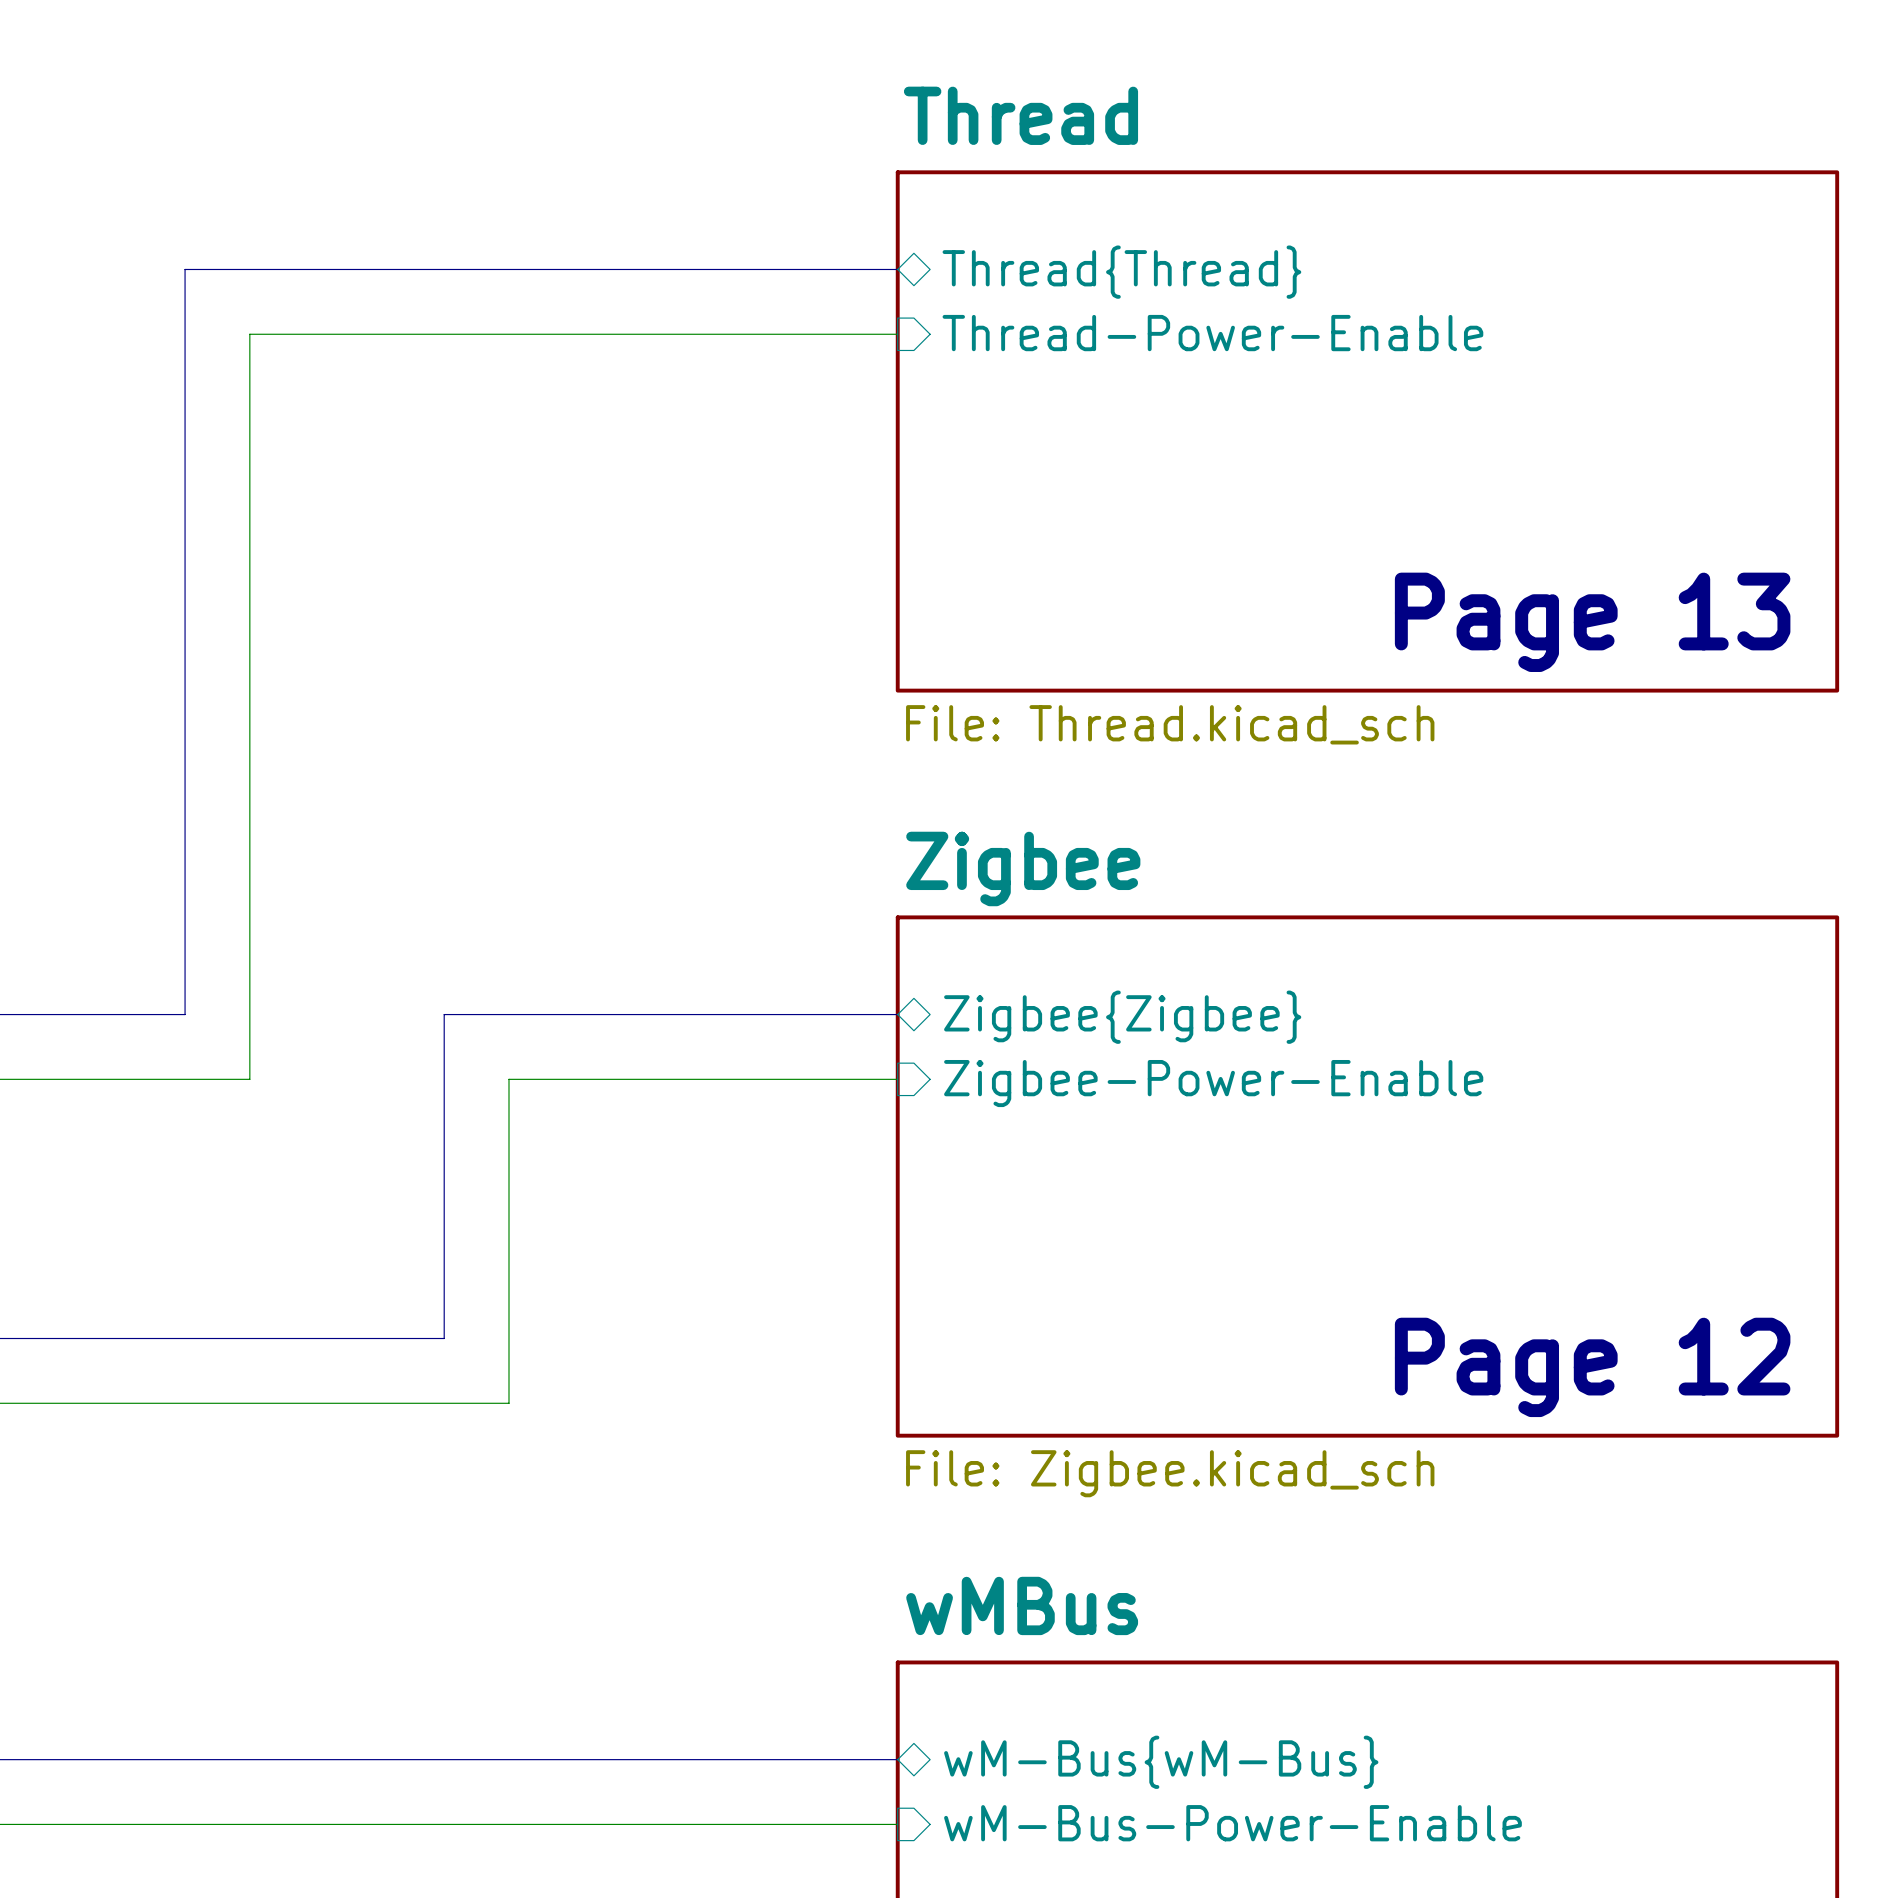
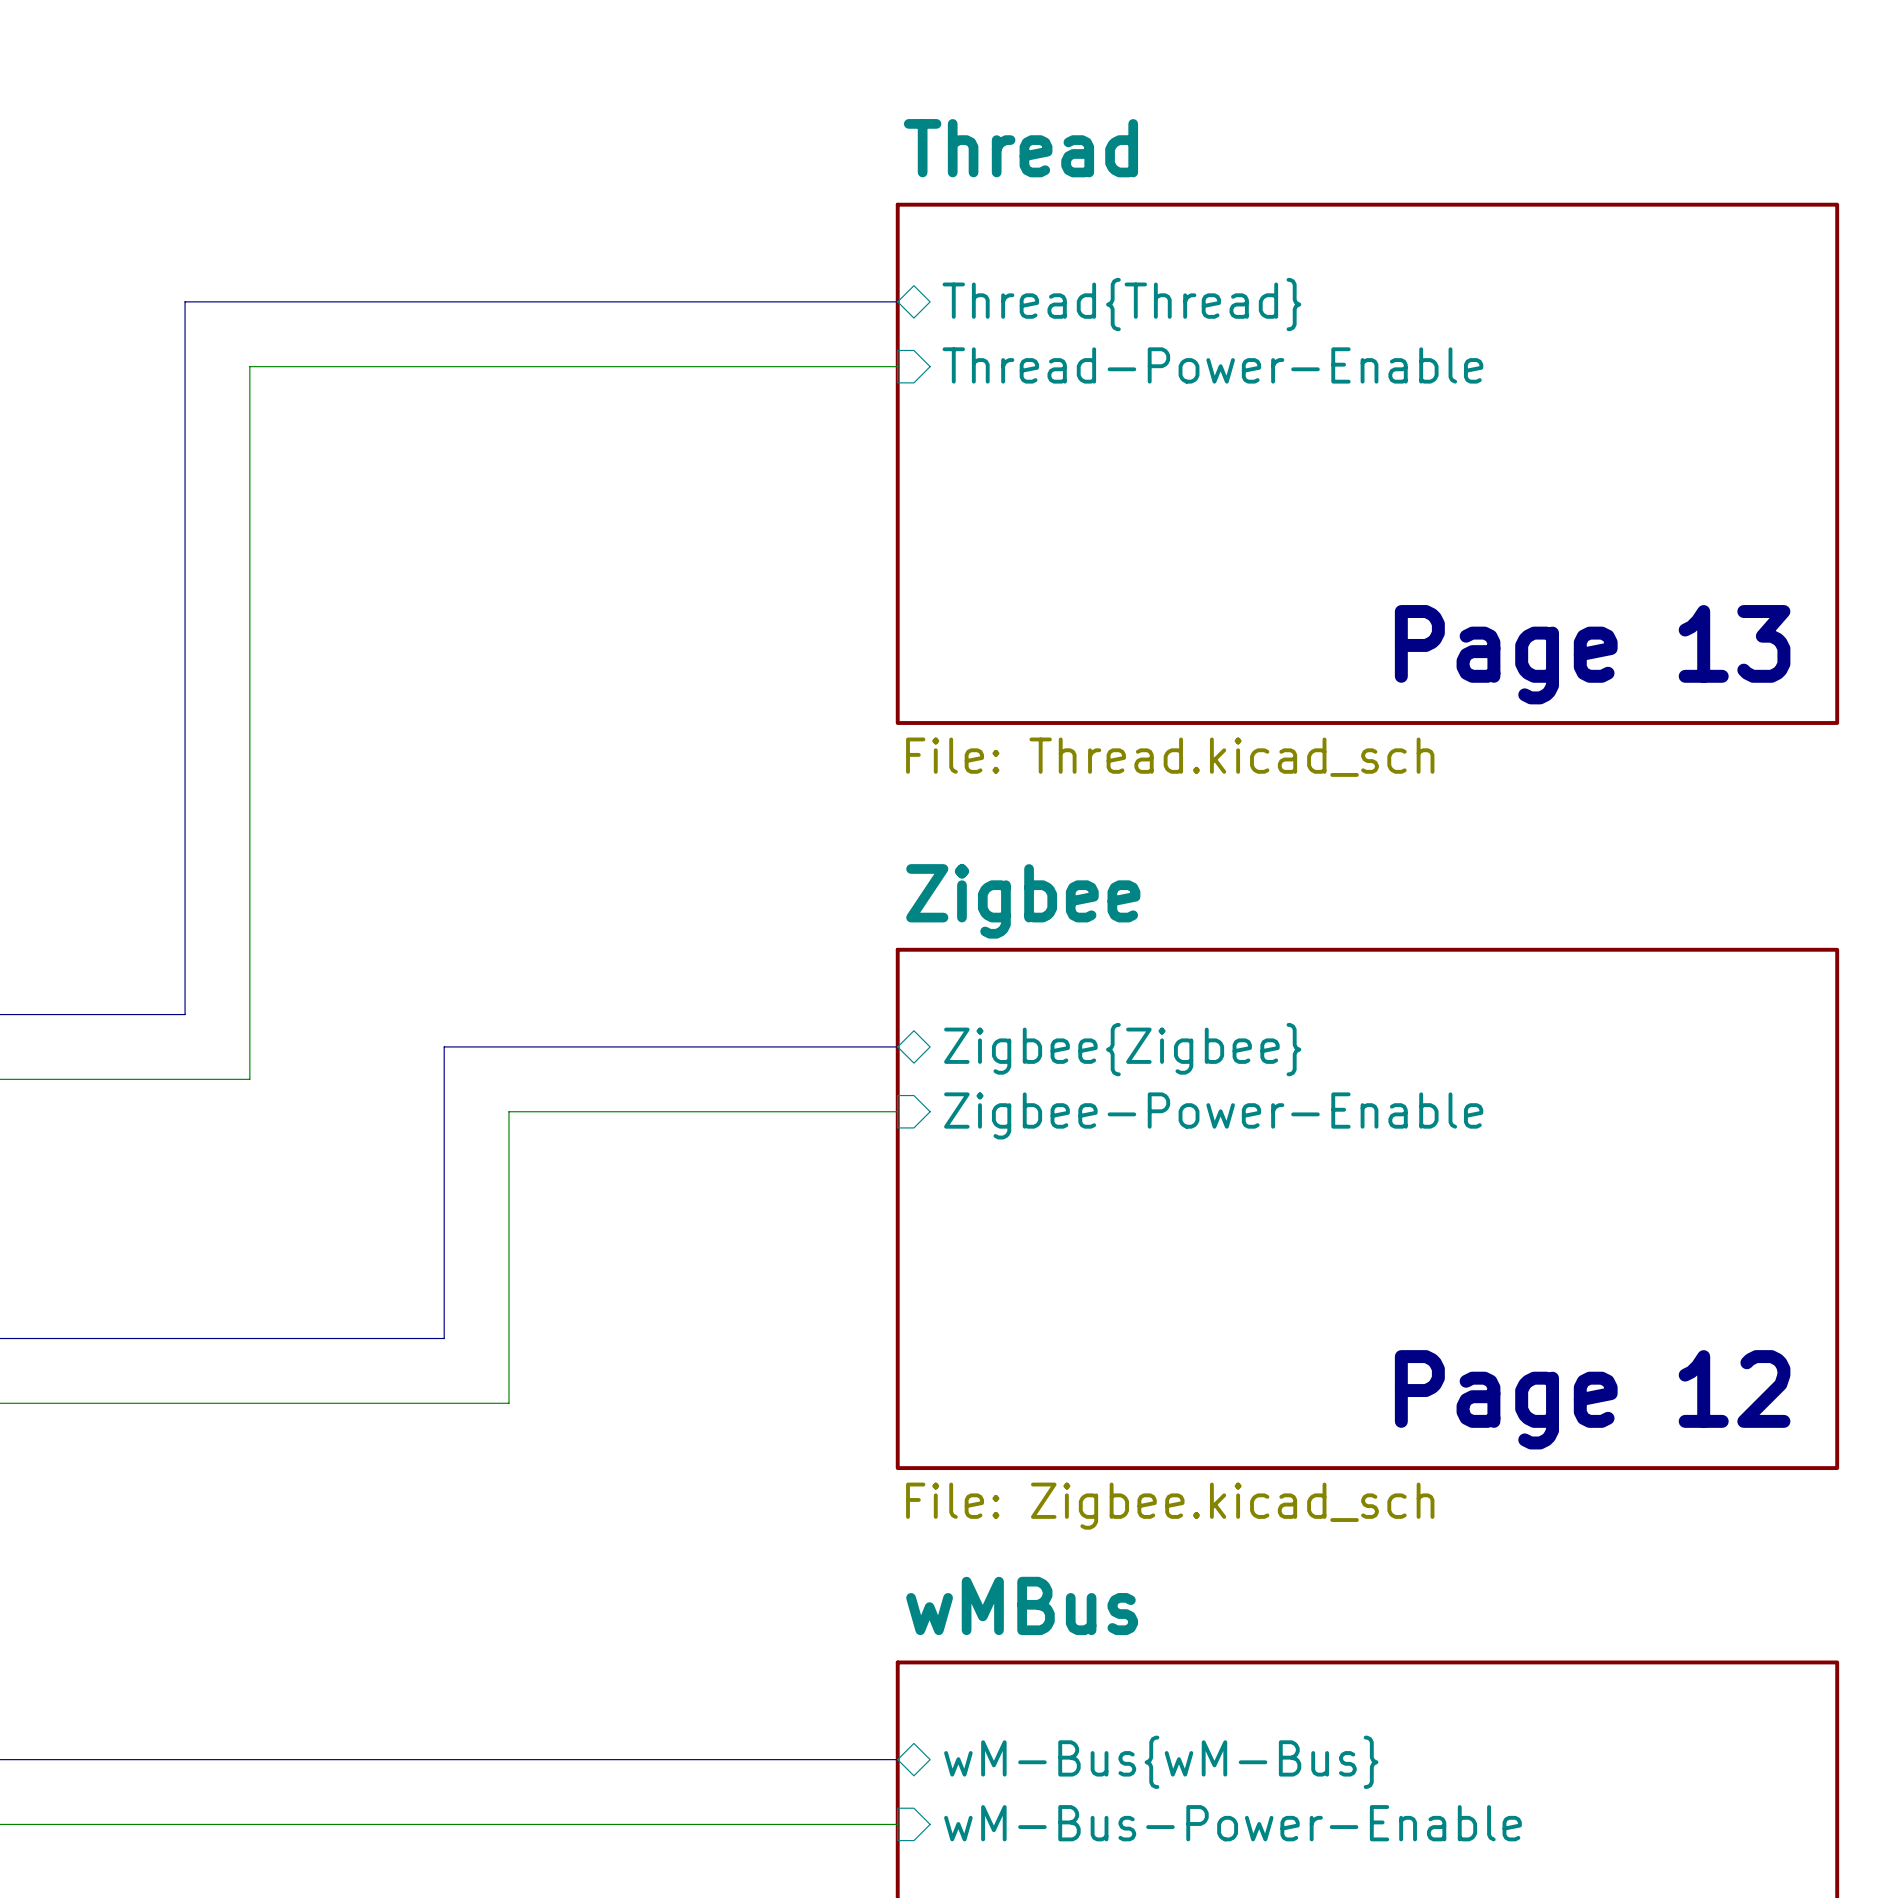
bus: (897, 269) (185, 269) (185, 301) -> (897, 301) (185, 301)
sheet pin position: Thread{Thread} (1121, 272) -> Thread{Thread} (1121, 304)
sheet pin position: Thread-Power-Enable (1212, 333) -> Thread-Power-Enable (1212, 365)
wire: (897, 334) (249, 334) (249, 366) -> (897, 366) (249, 366)
sheet Thread position: (1367, 431) -> (1367, 463)
text position: Page 13 (1592, 622) -> Page 13 (1592, 654)
bus: (897, 1014) (444, 1014) (444, 1046) -> (897, 1046) (444, 1046)
sheet pin position: Zigbee{Zigbee} (1122, 1017) -> Zigbee{Zigbee} (1122, 1049)
wire: (897, 1079) (508, 1079) (508, 1111) -> (897, 1111) (508, 1111)
sheet pin position: Zigbee-Power-Enable (1213, 1083) -> Zigbee-Power-Enable (1213, 1115)
sheet Zigbee position: (1367, 1176) -> (1367, 1208)
text position: Page 12 (1592, 1367) -> Page 12 (1592, 1399)

